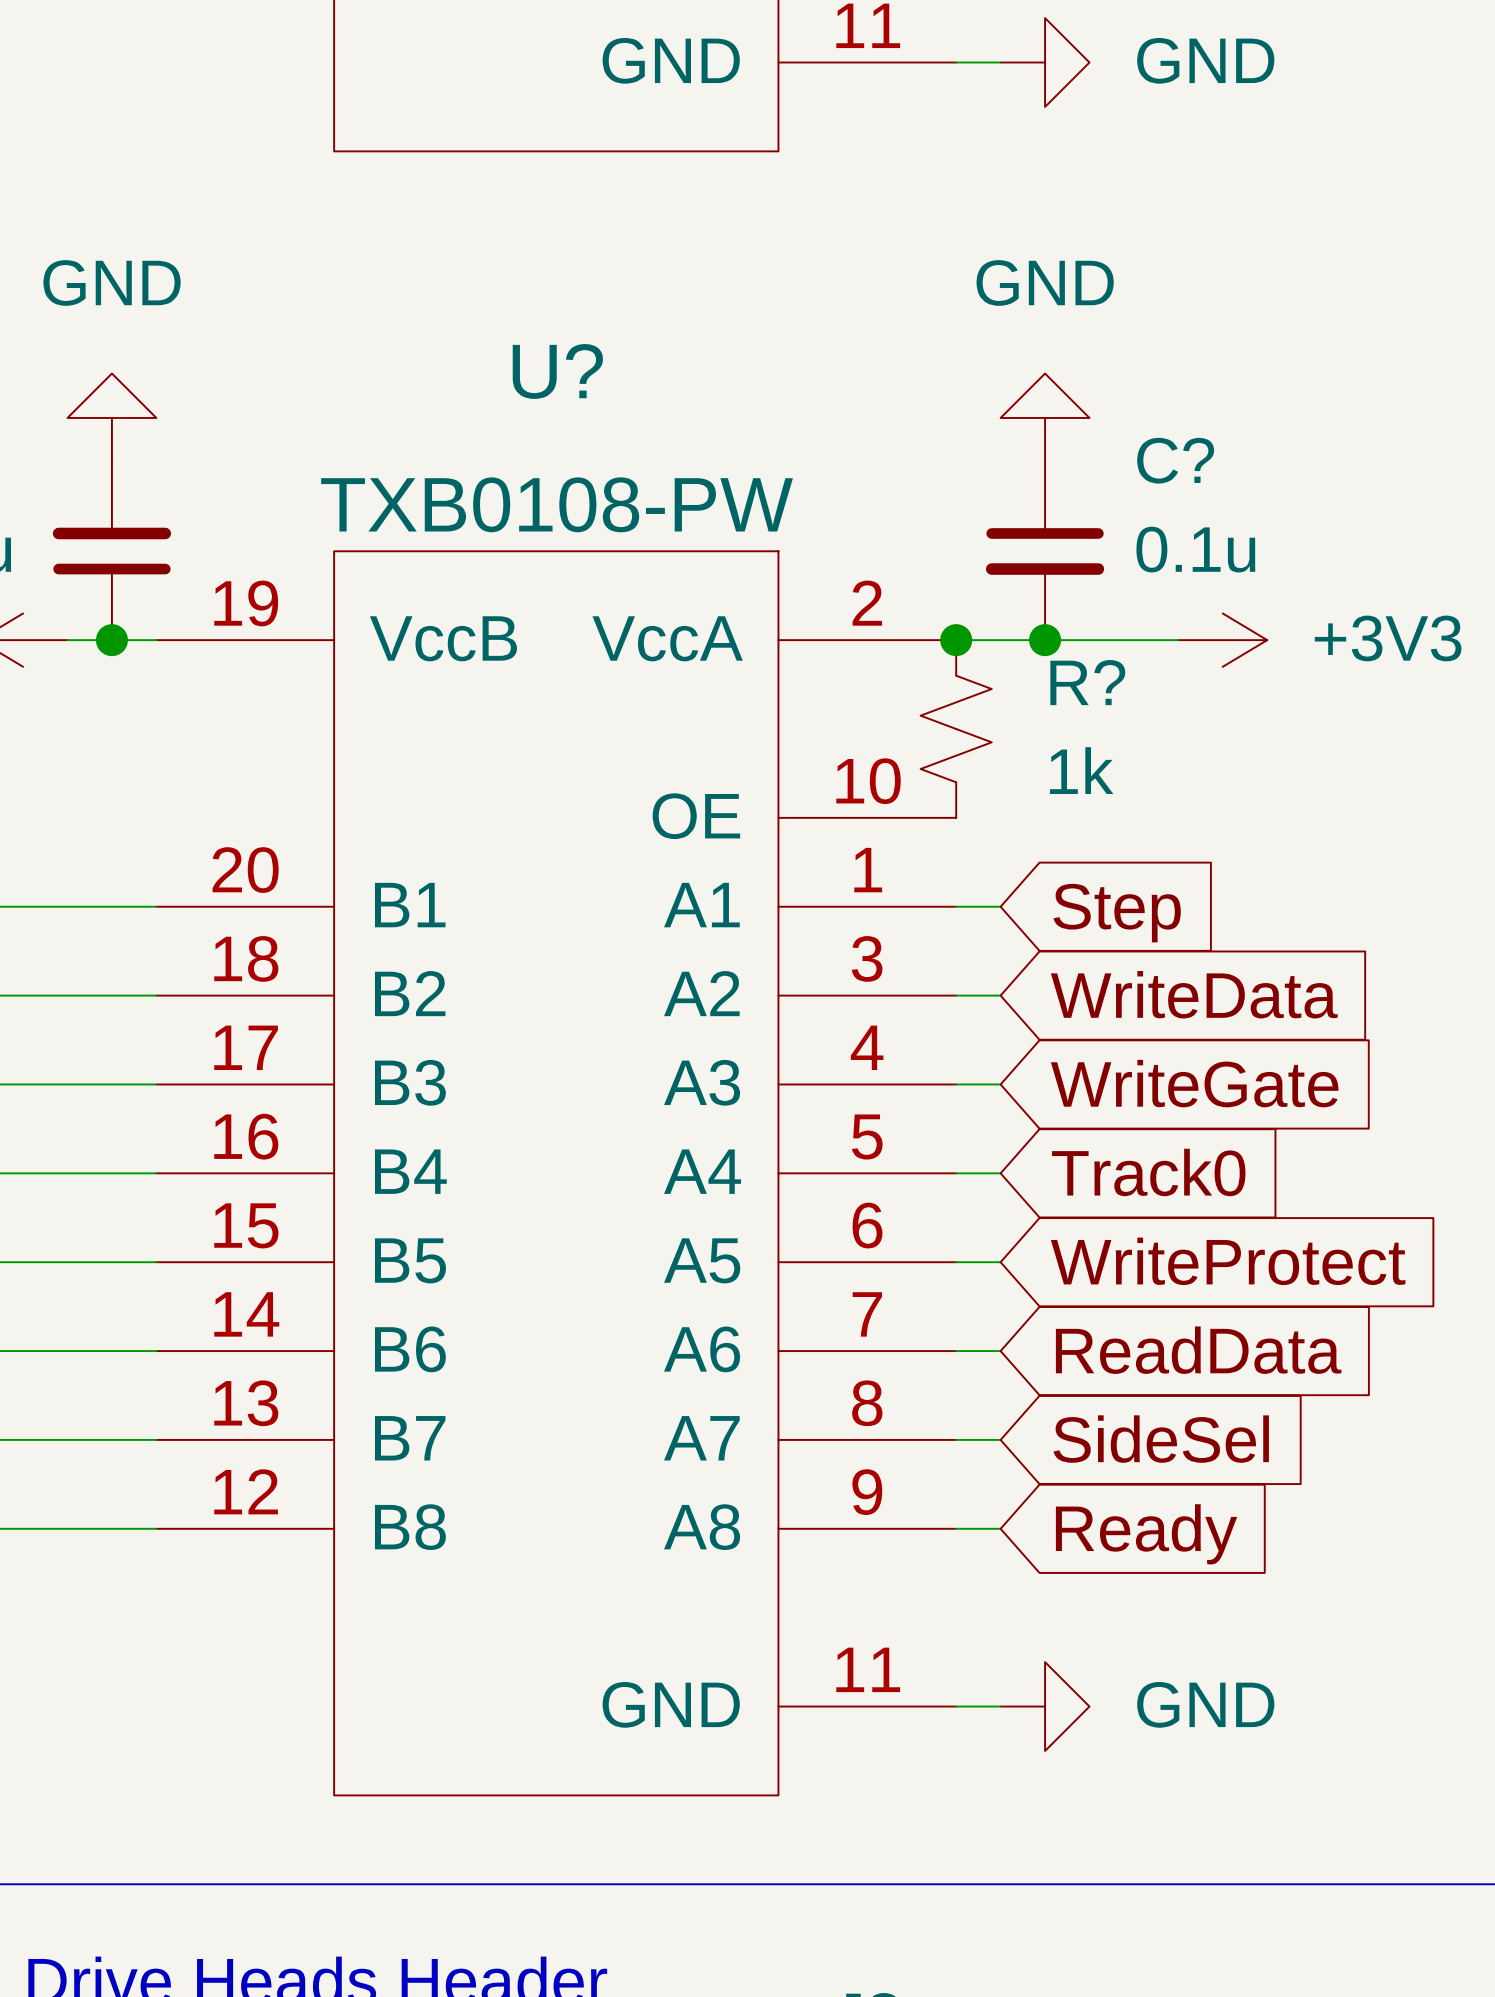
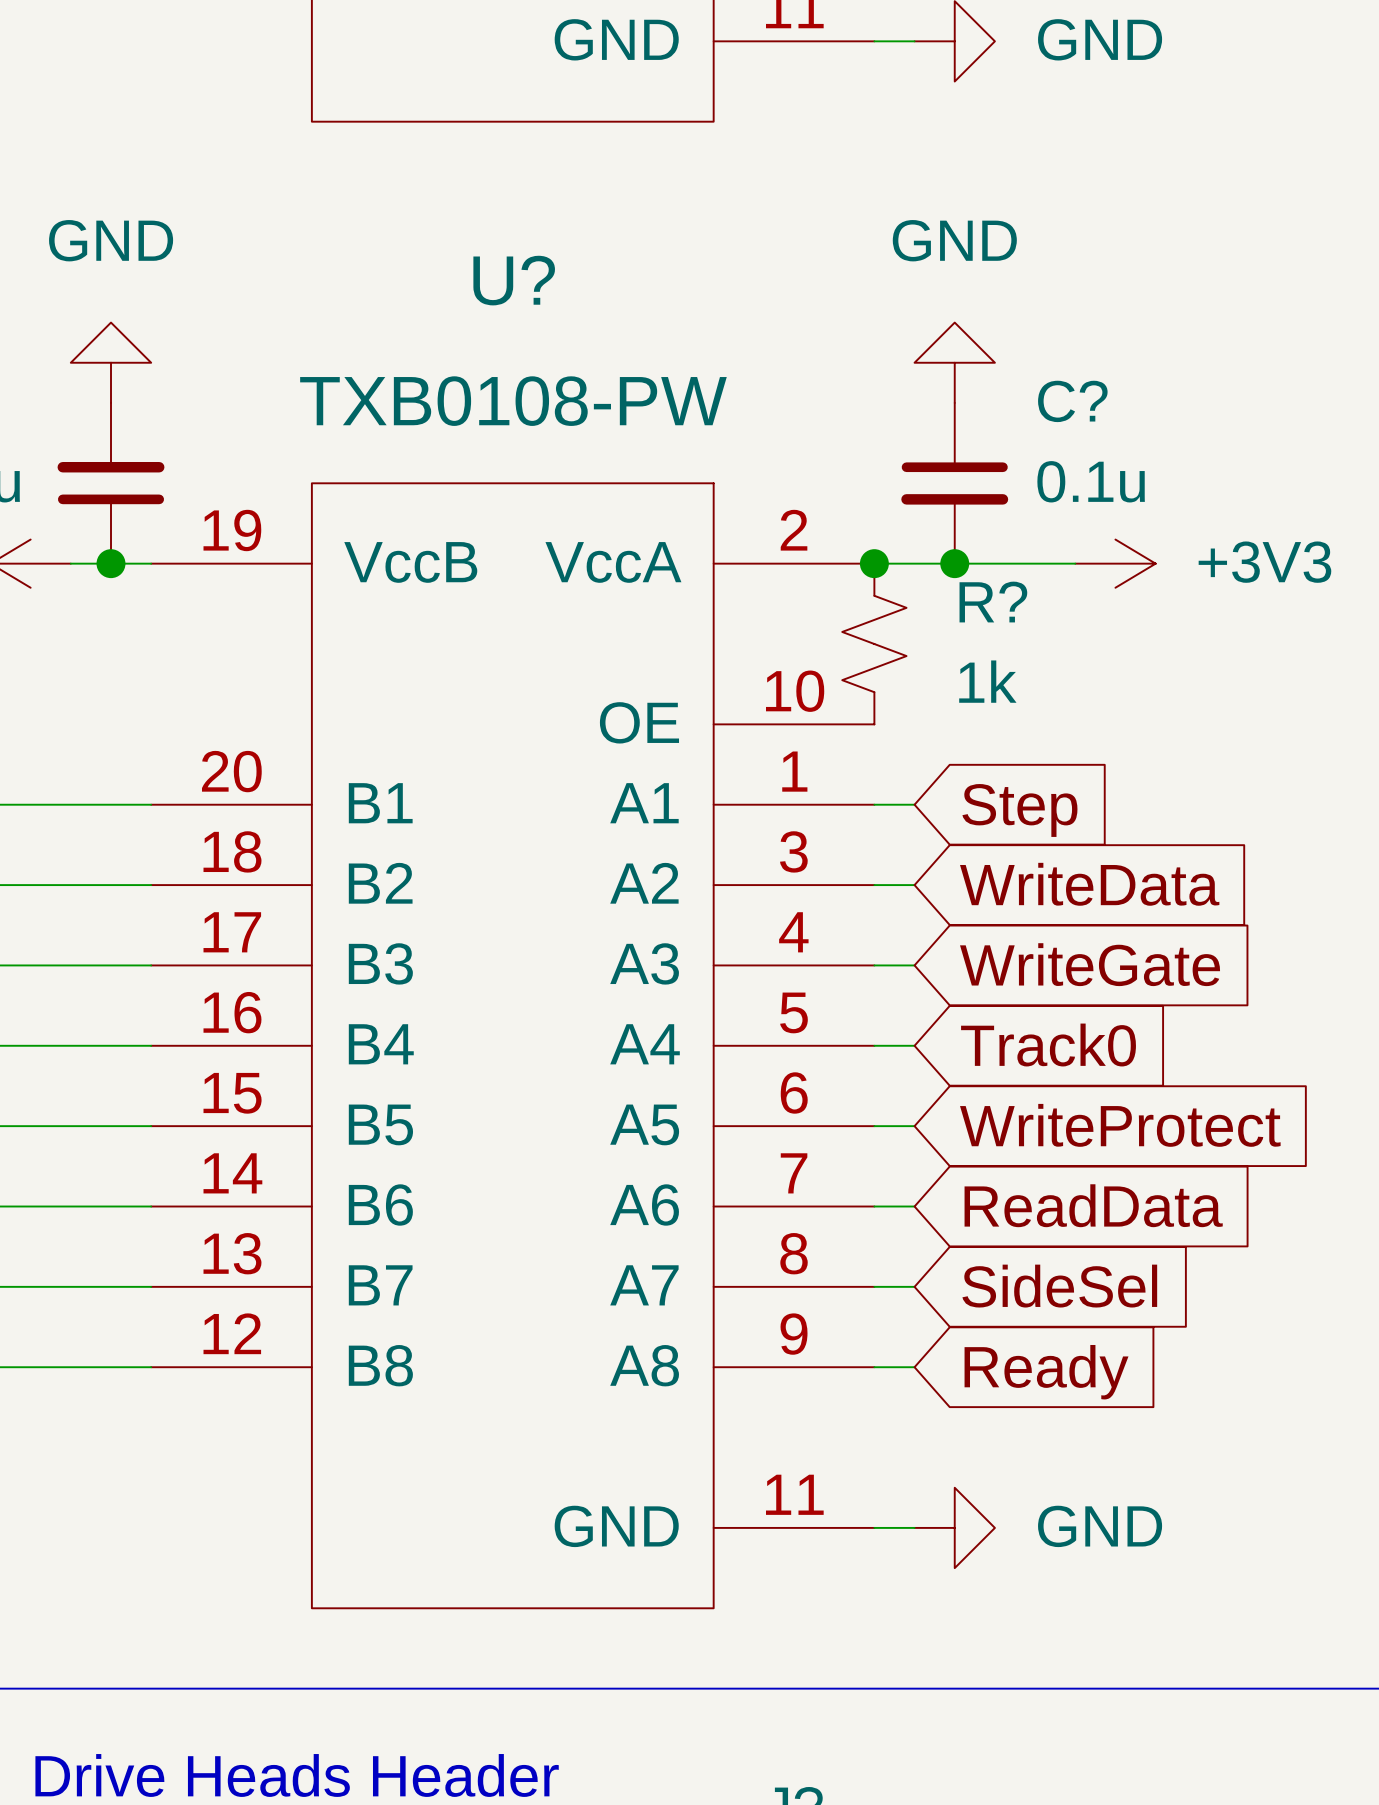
U? name position: U? (557, 371) -> U? (514, 280)
U? value position: TXB0108-PW (557, 504) -> TXB0108-PW (513, 401)

